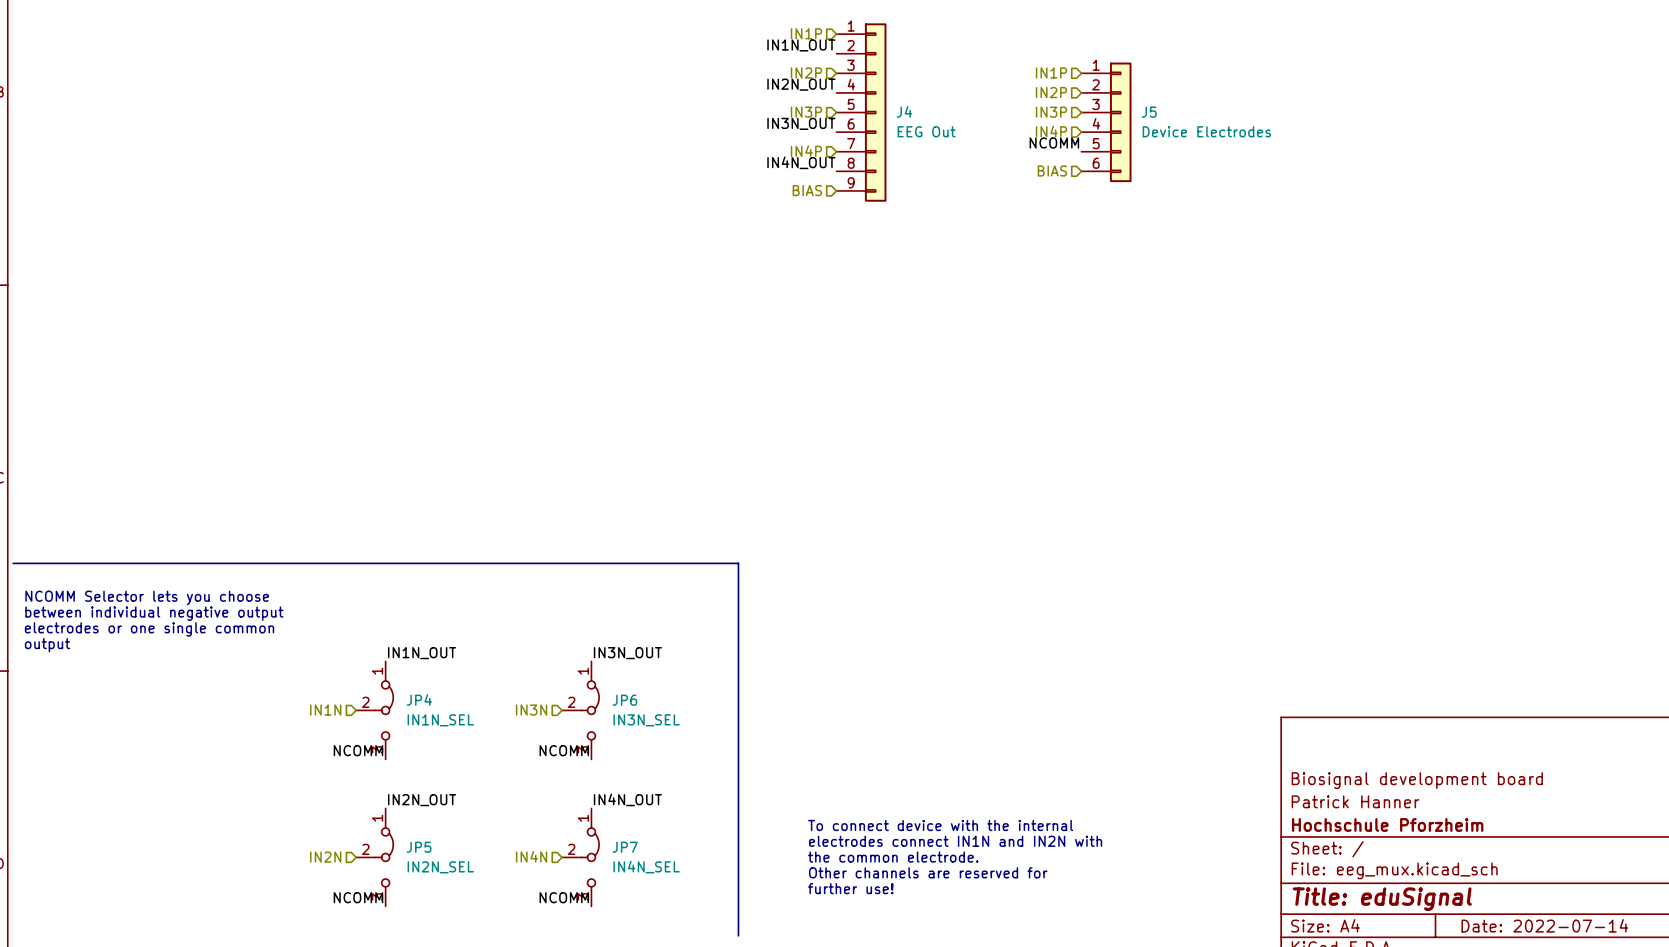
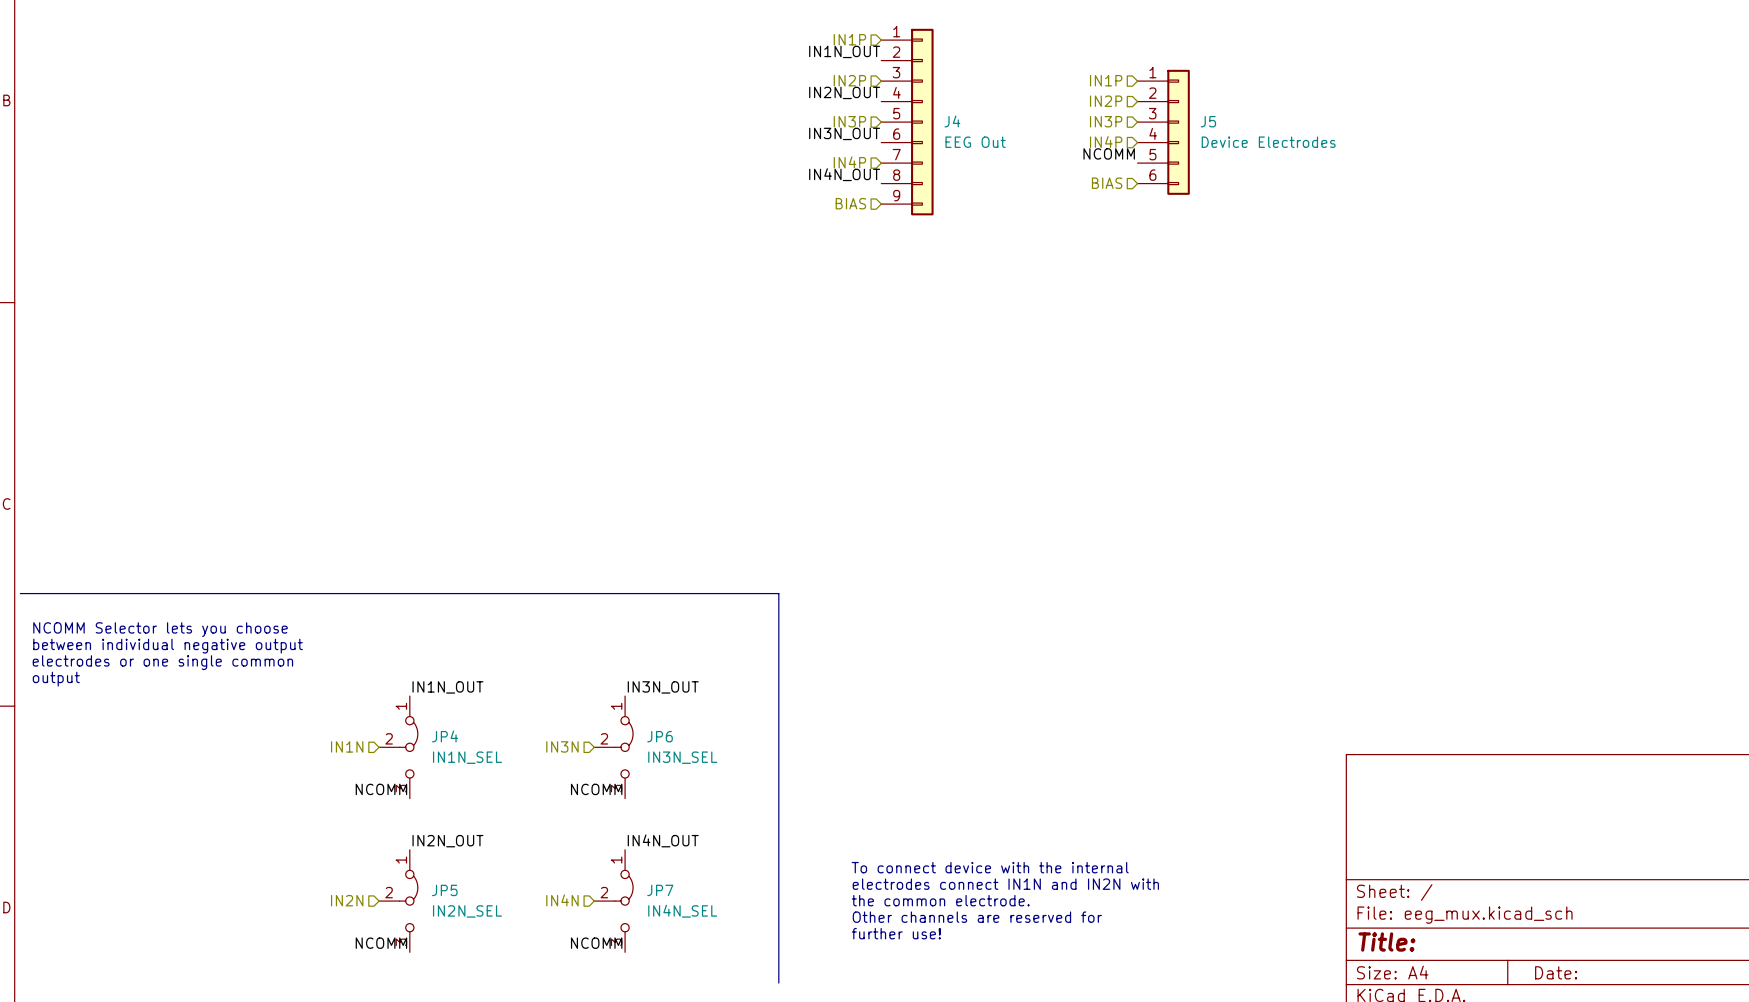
title block: Biosignal development board (1417, 780) -> none
title block: Patrick Hanner (1355, 801) -> none
title block: Hochschule Pforzheim (1387, 824) -> none
title block: Title: eduSignal (1382, 899) -> Title: (1386, 942)
title block: Date: 2022-07-14 (1544, 925) -> Date: (1556, 972)

